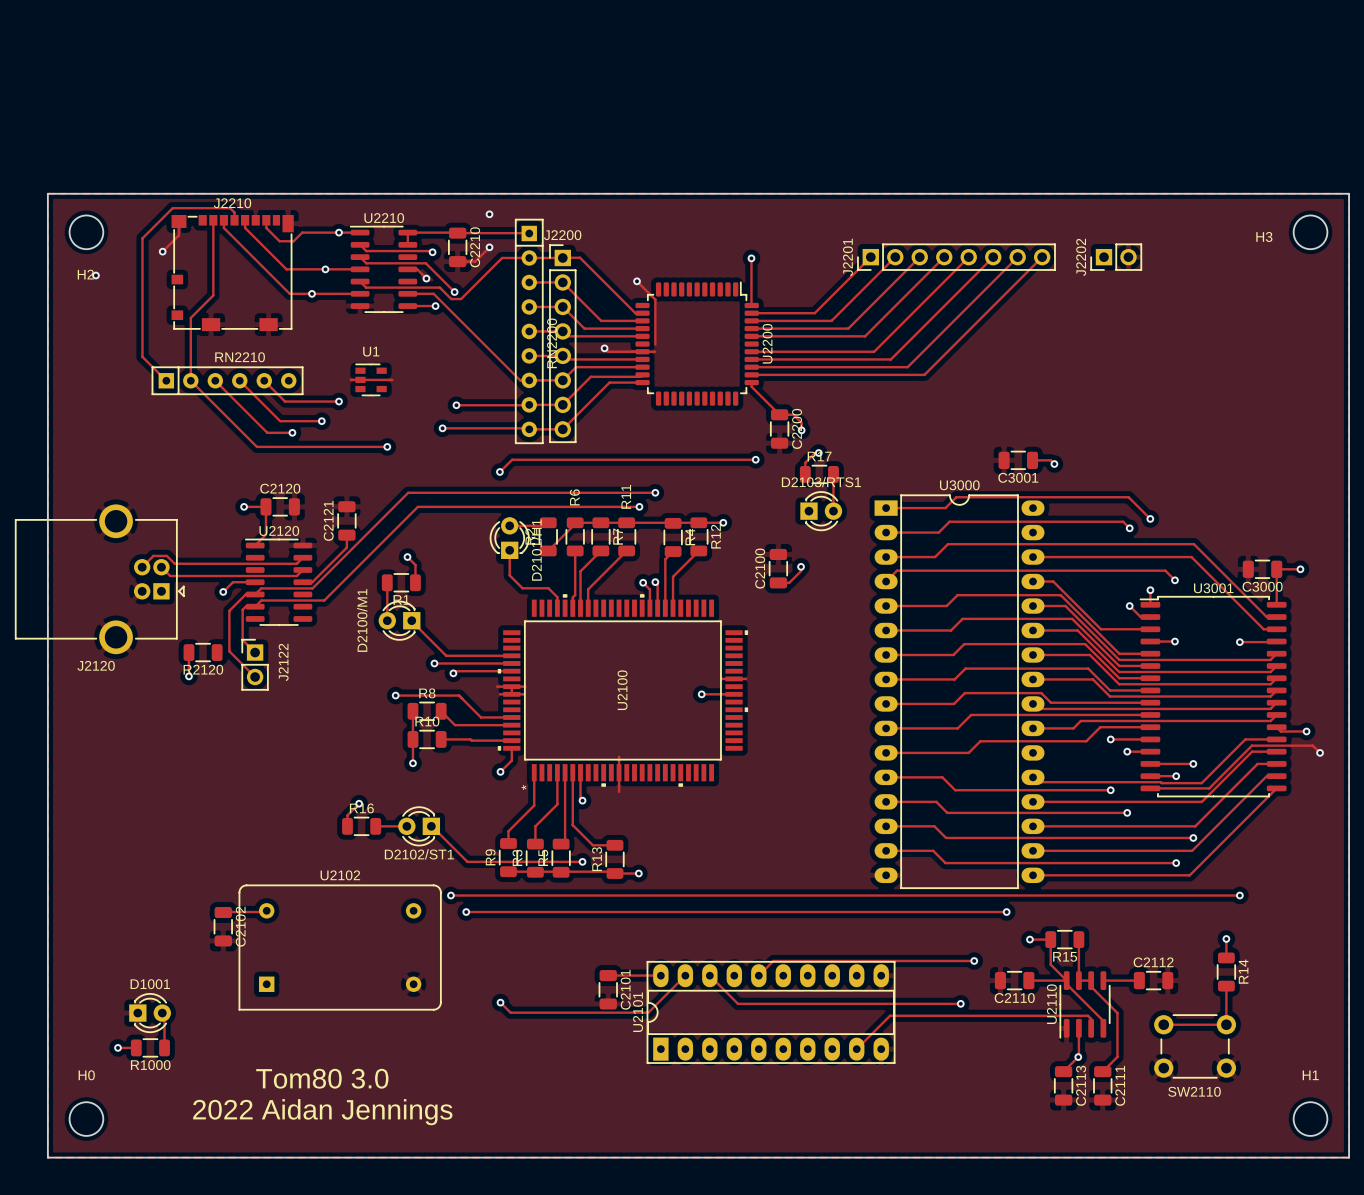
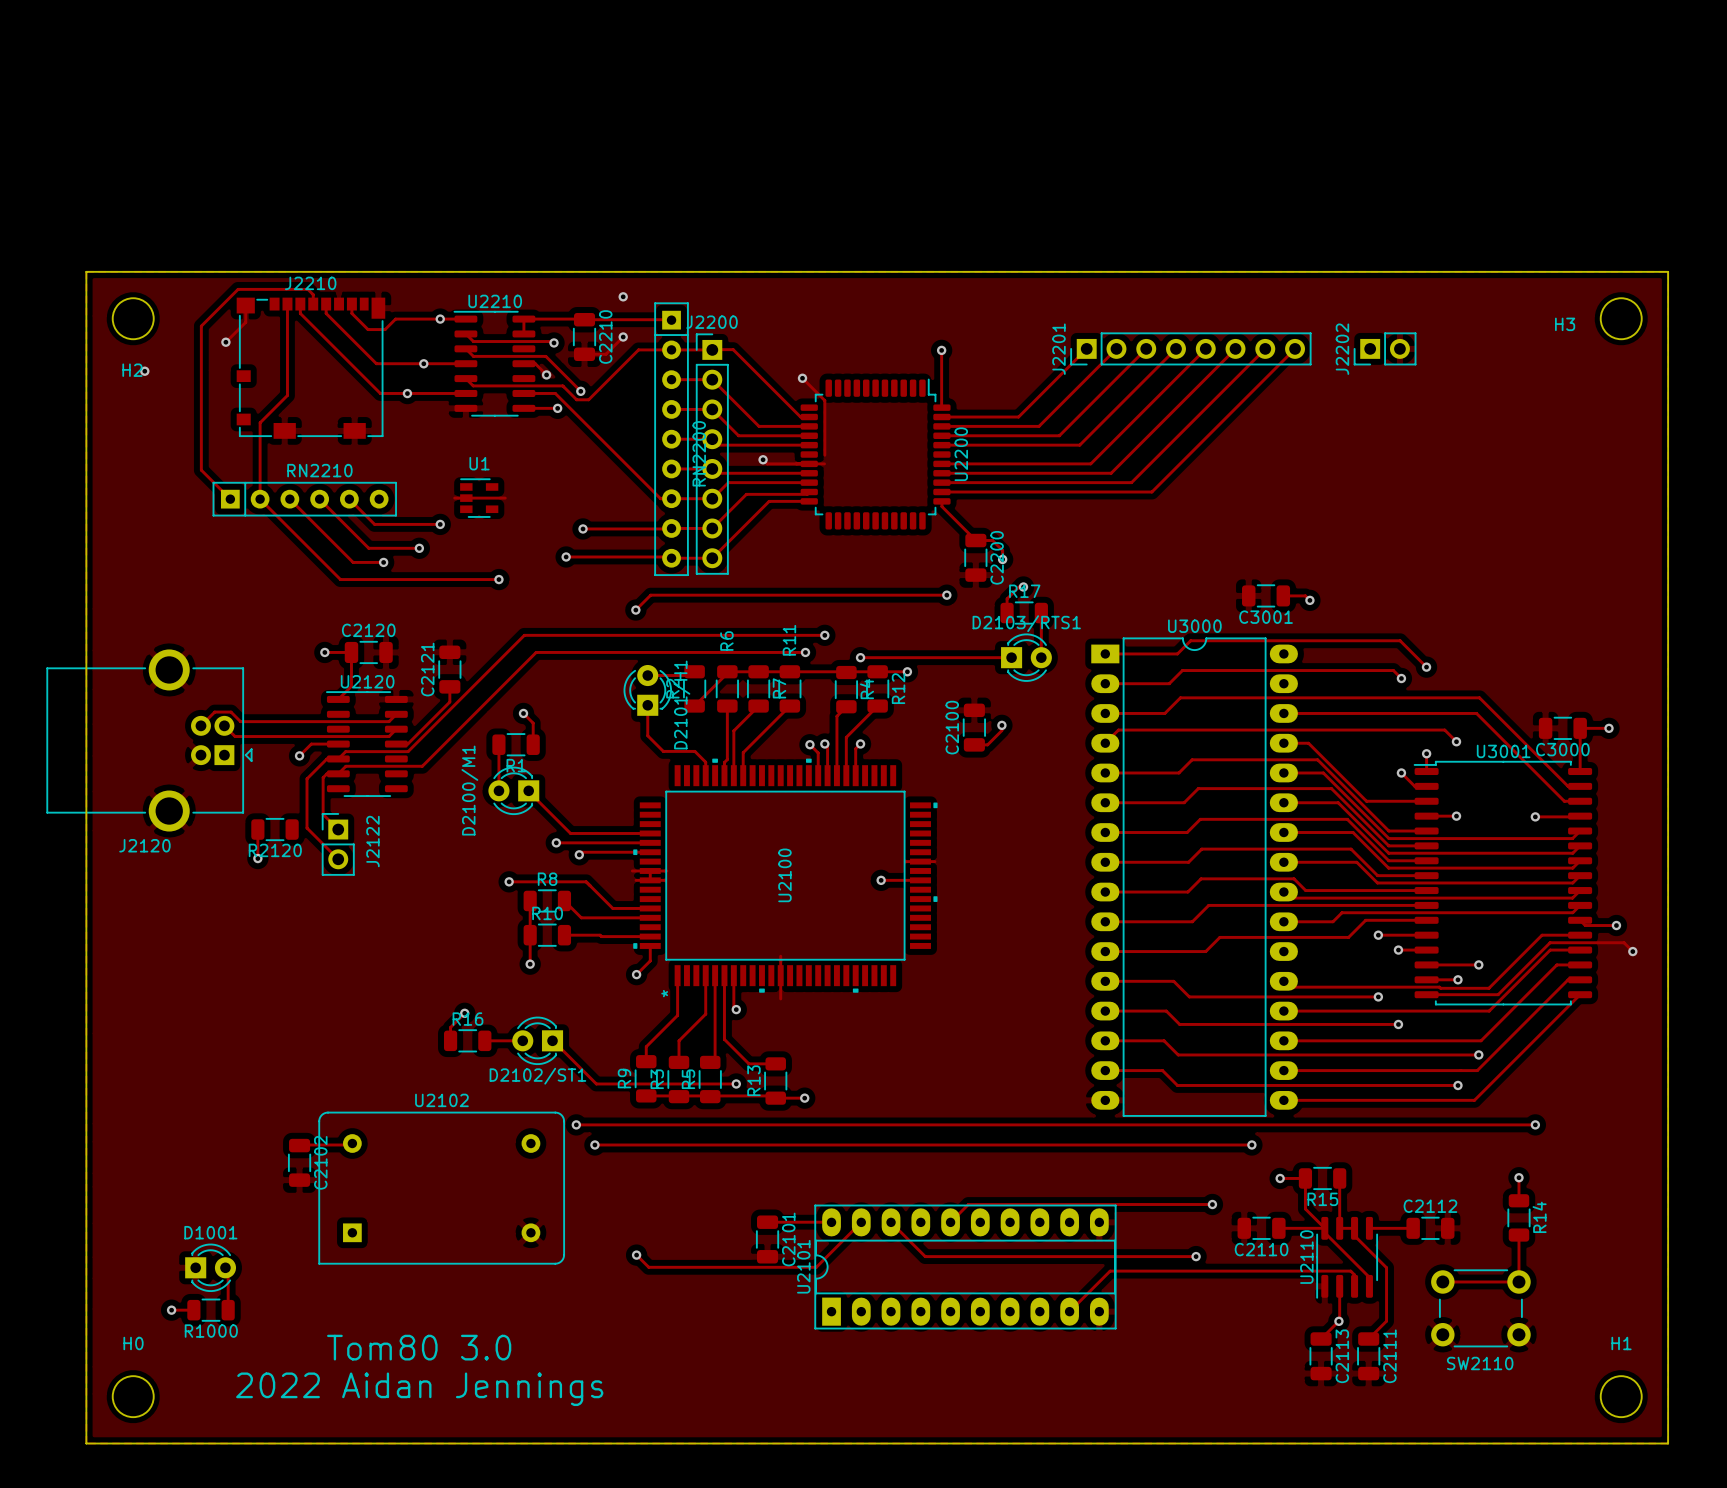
track: none -> (860, 657) (1011, 657)
via: none -> (860, 657)
track: none -> (860, 743) (855, 748) (855, 775)
via: none -> (860, 743)

